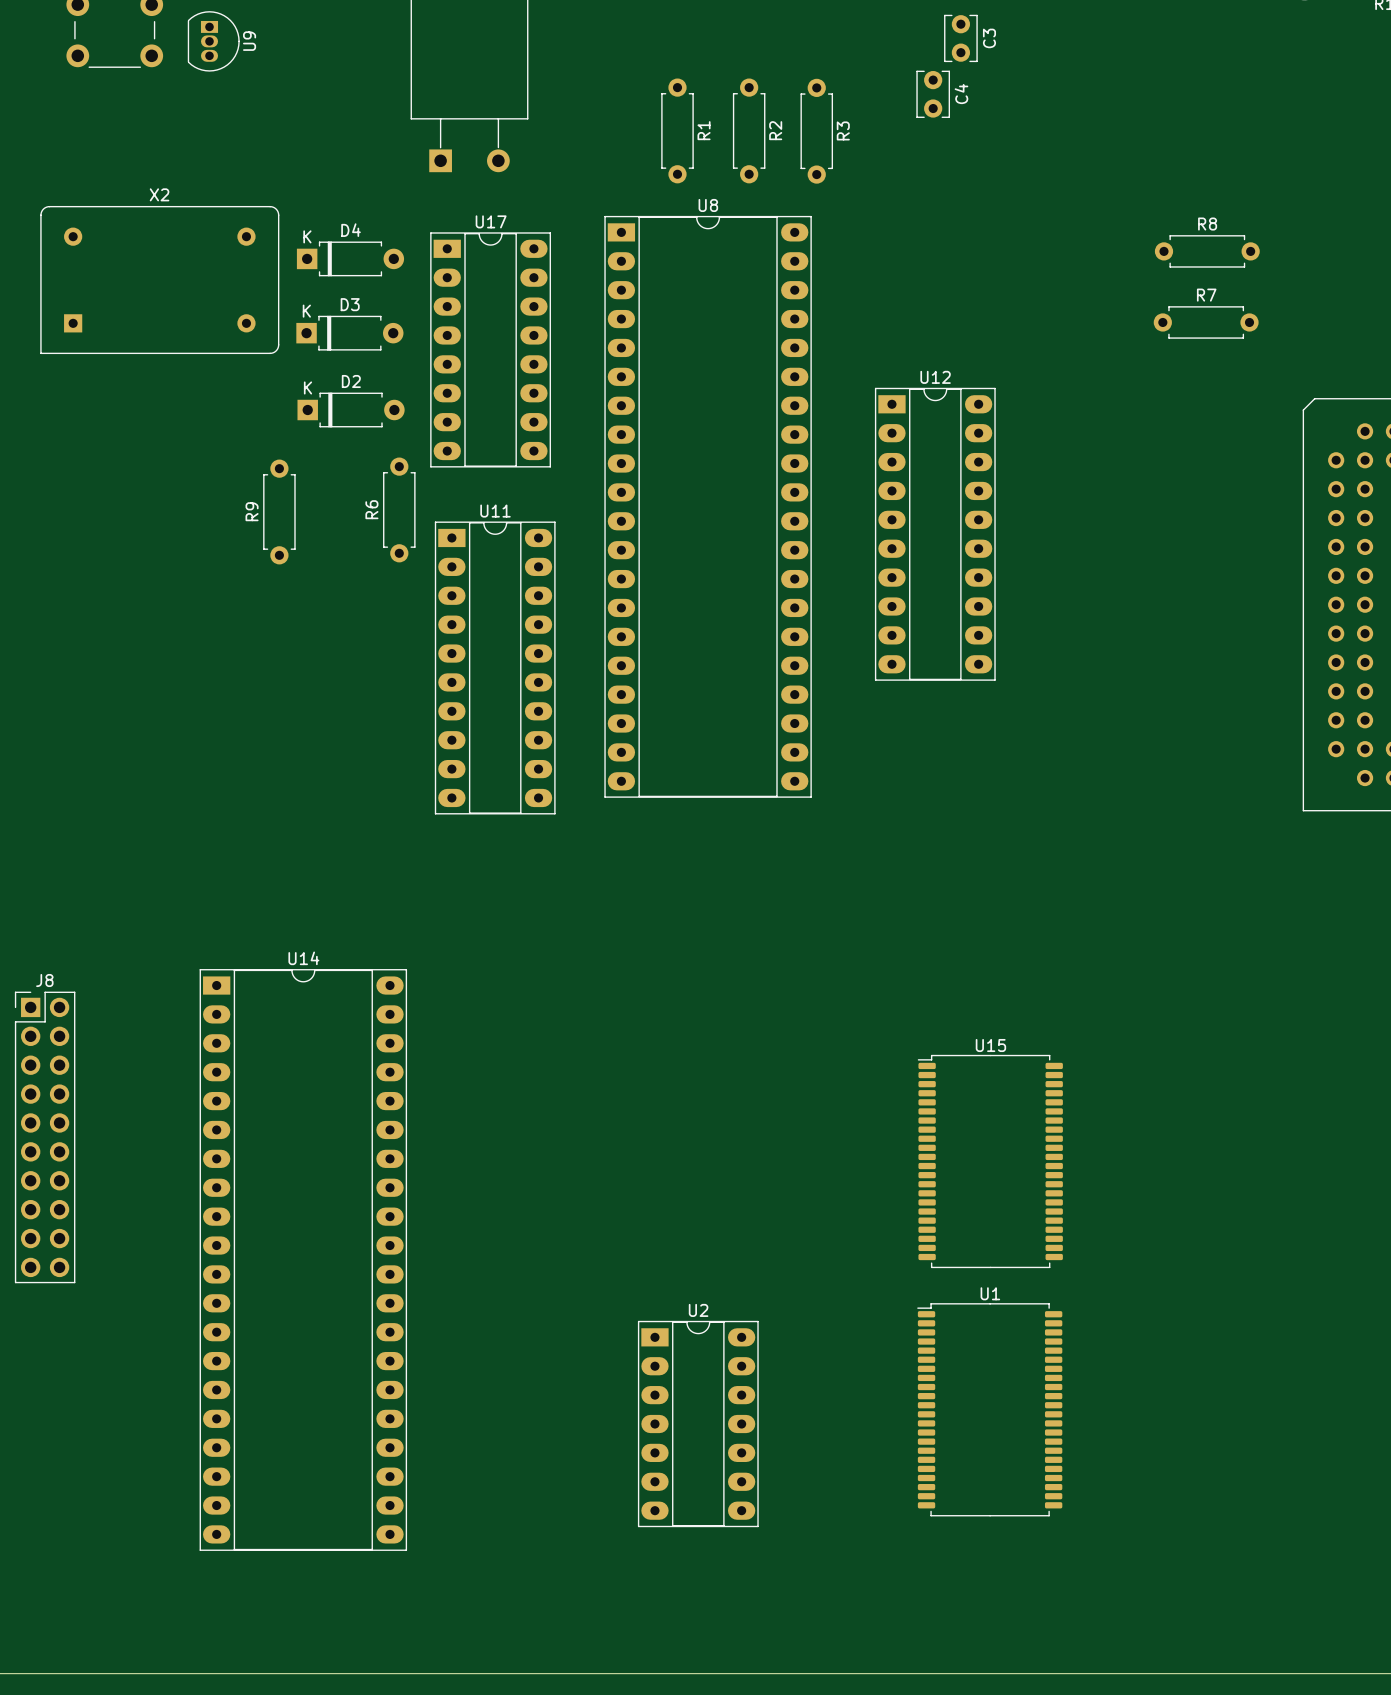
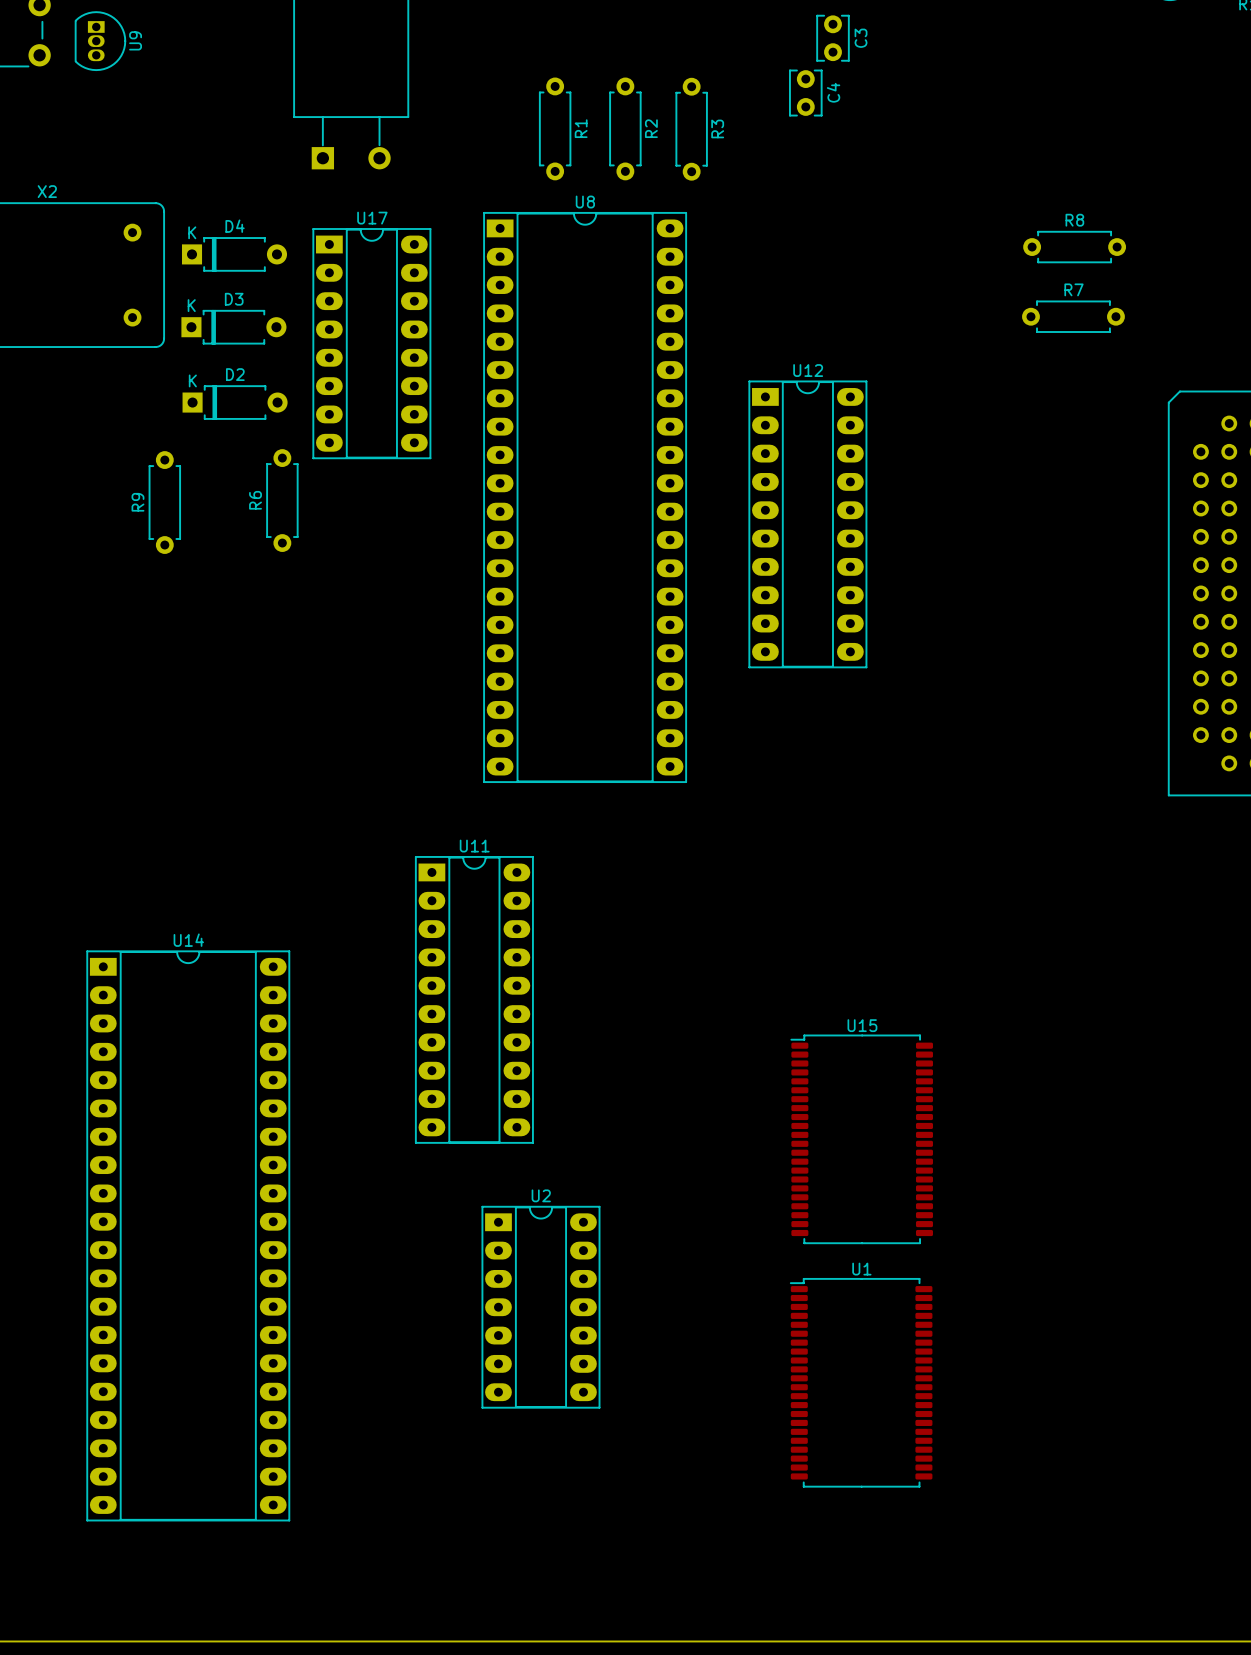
U11 position: (495, 667) -> (474, 999)
U2 position: (698, 1424) -> (540, 1307)

